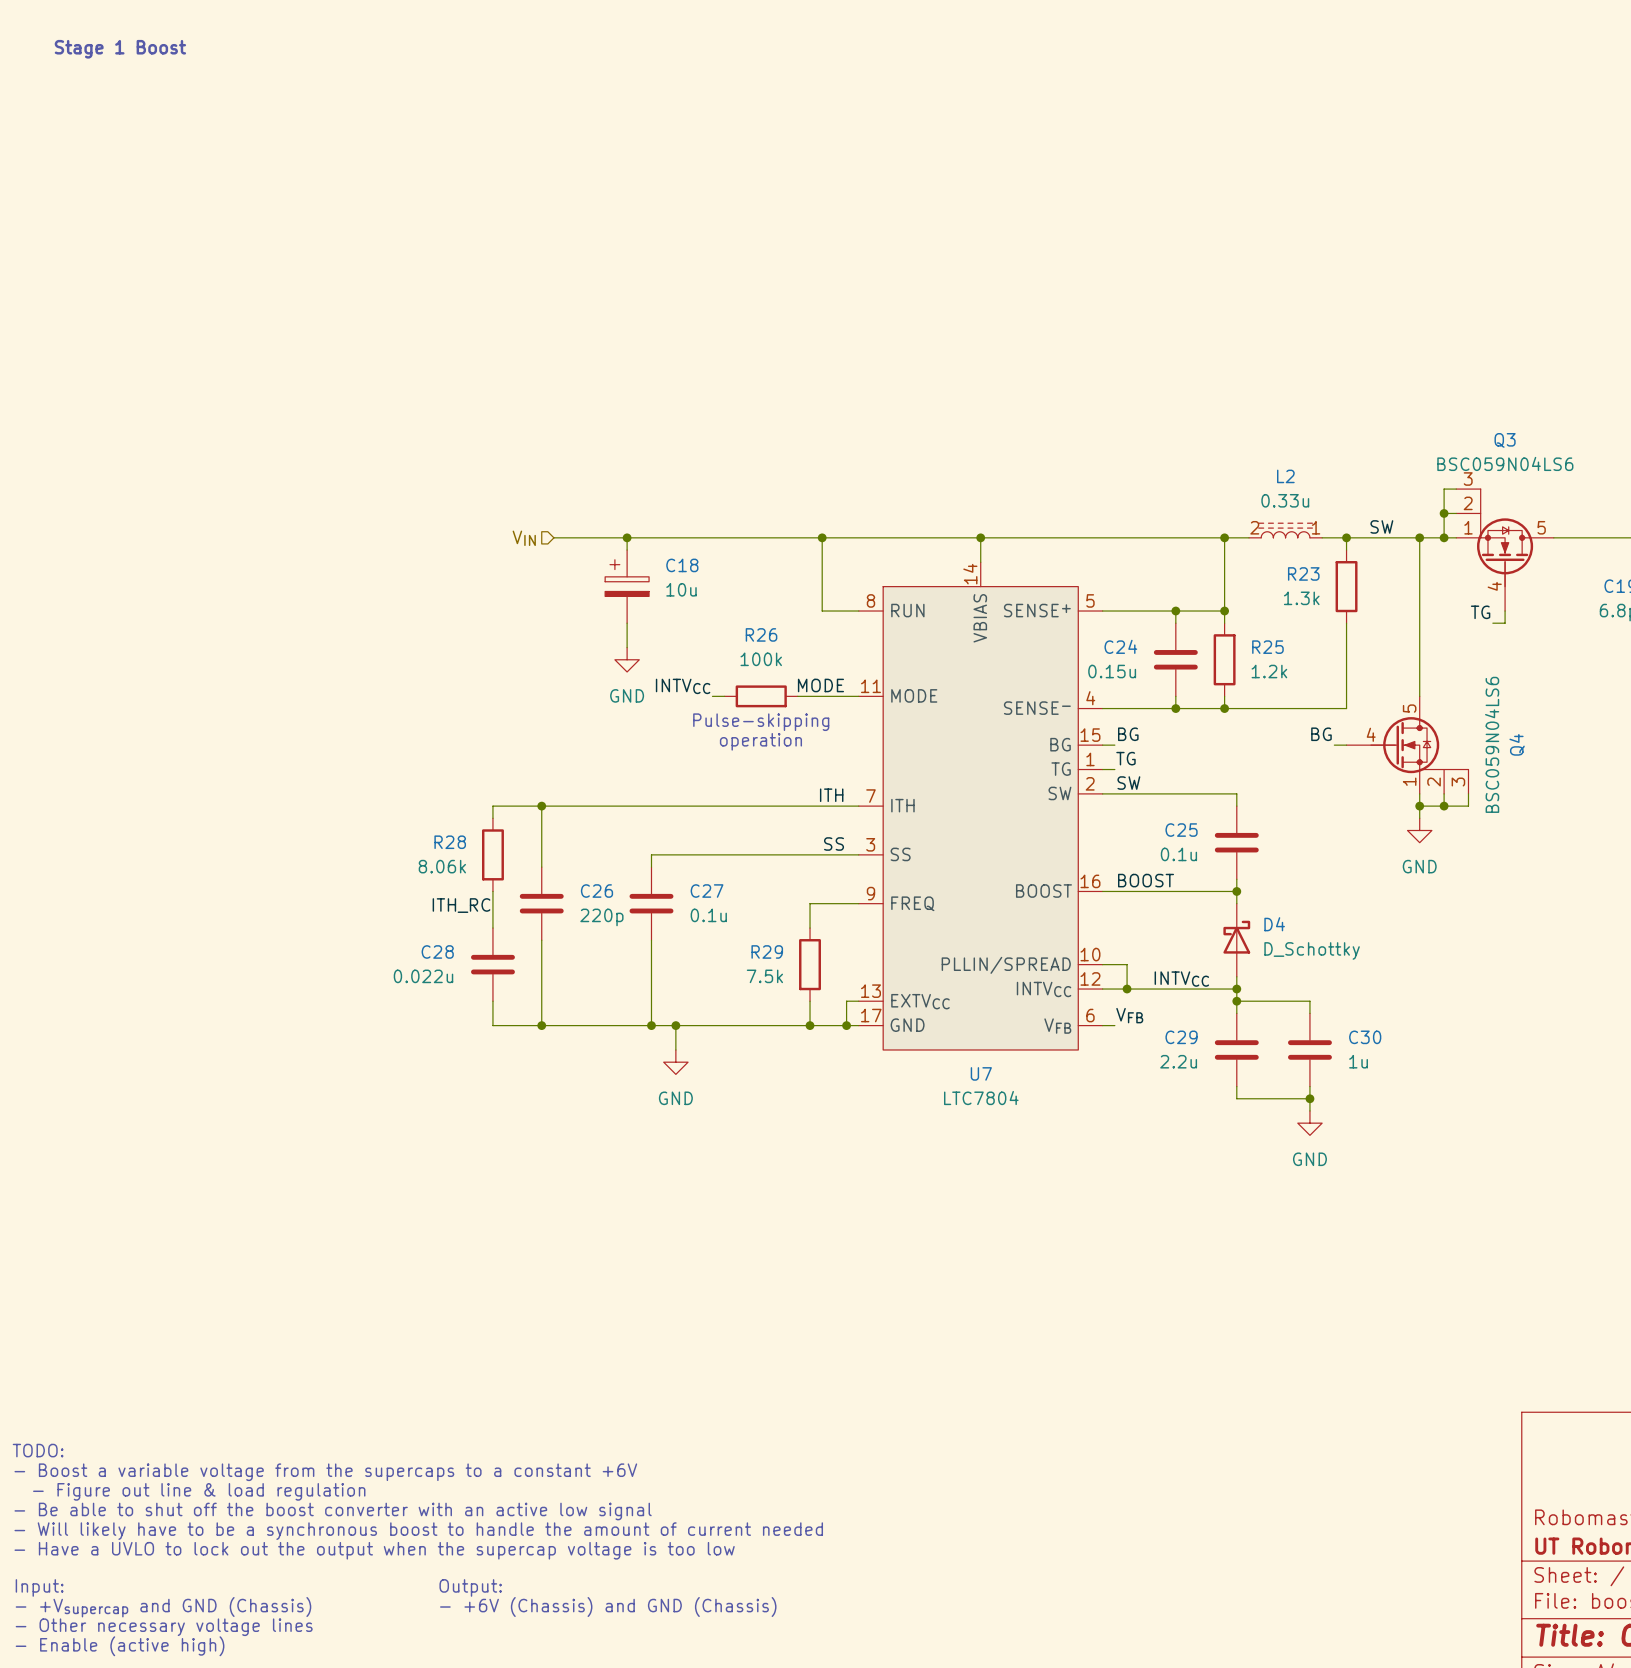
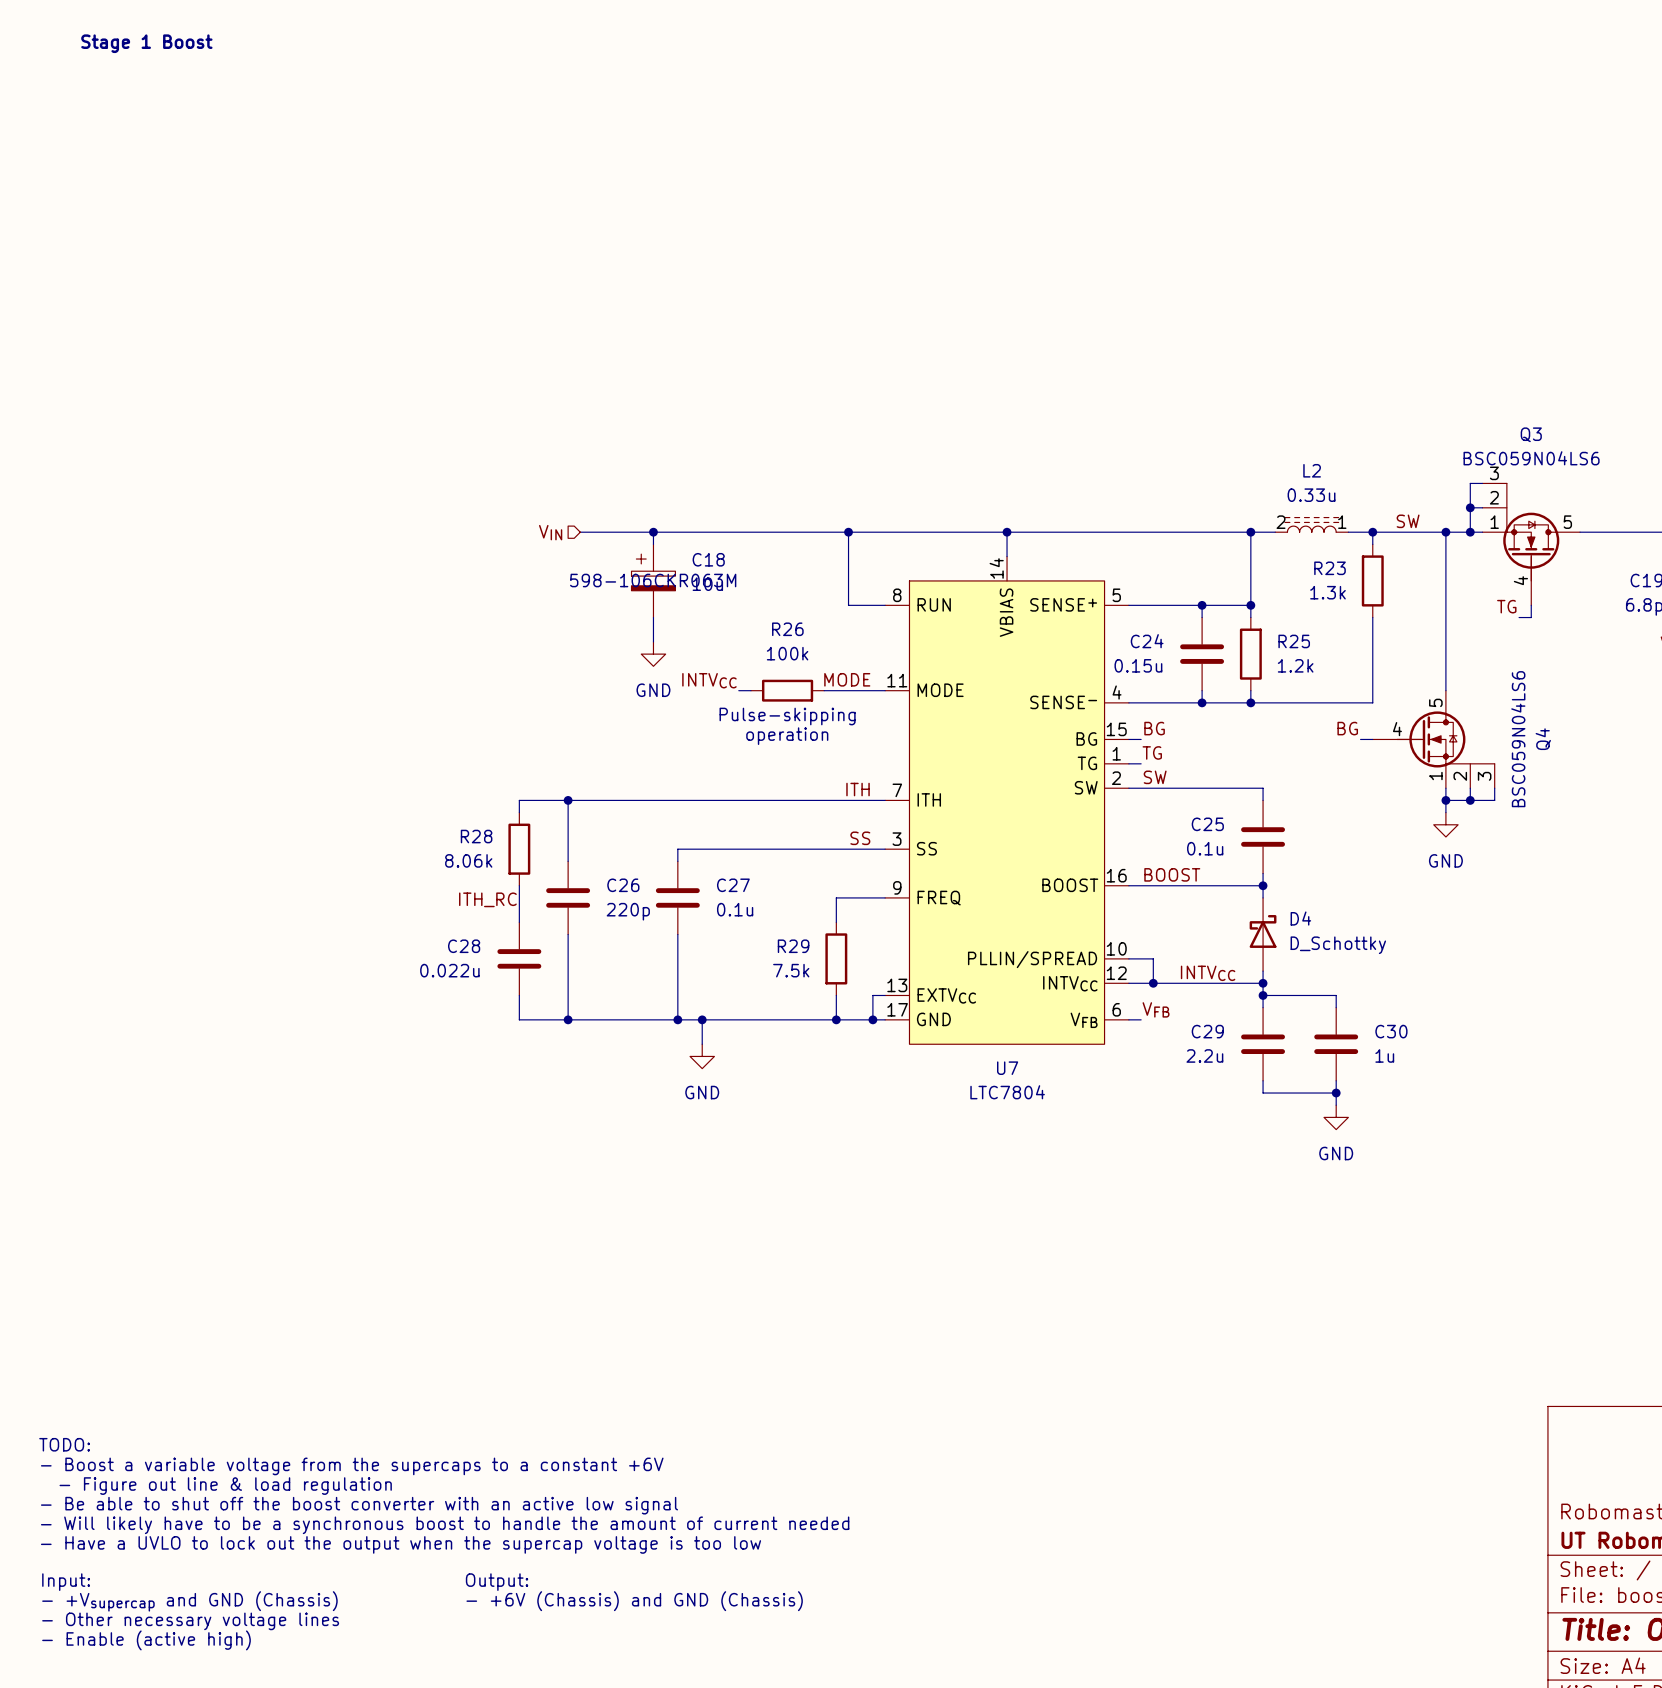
C18 text: none -> 598-106CKR063M (653, 580)

